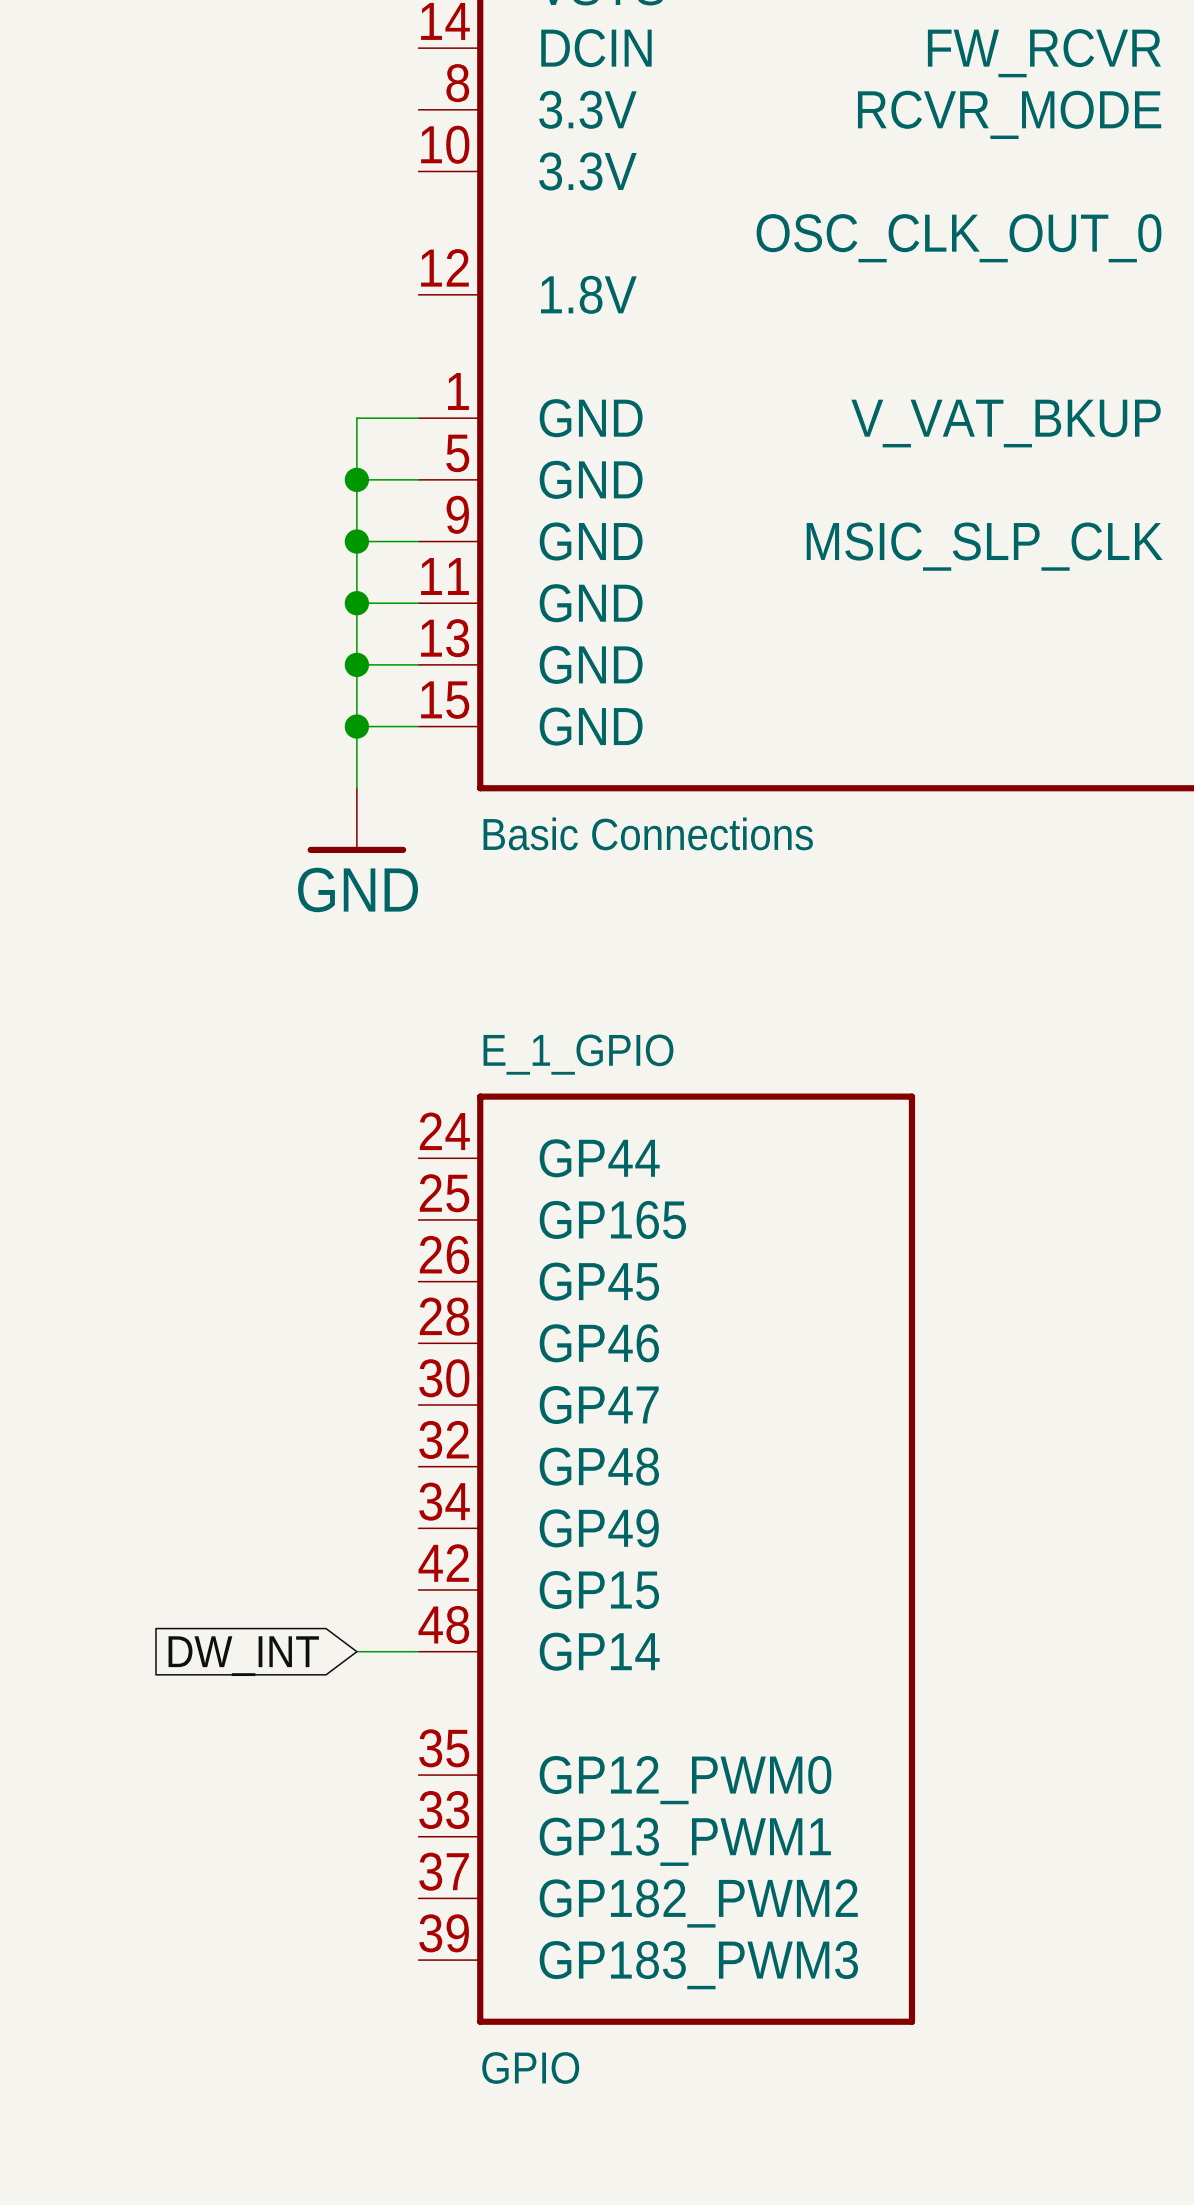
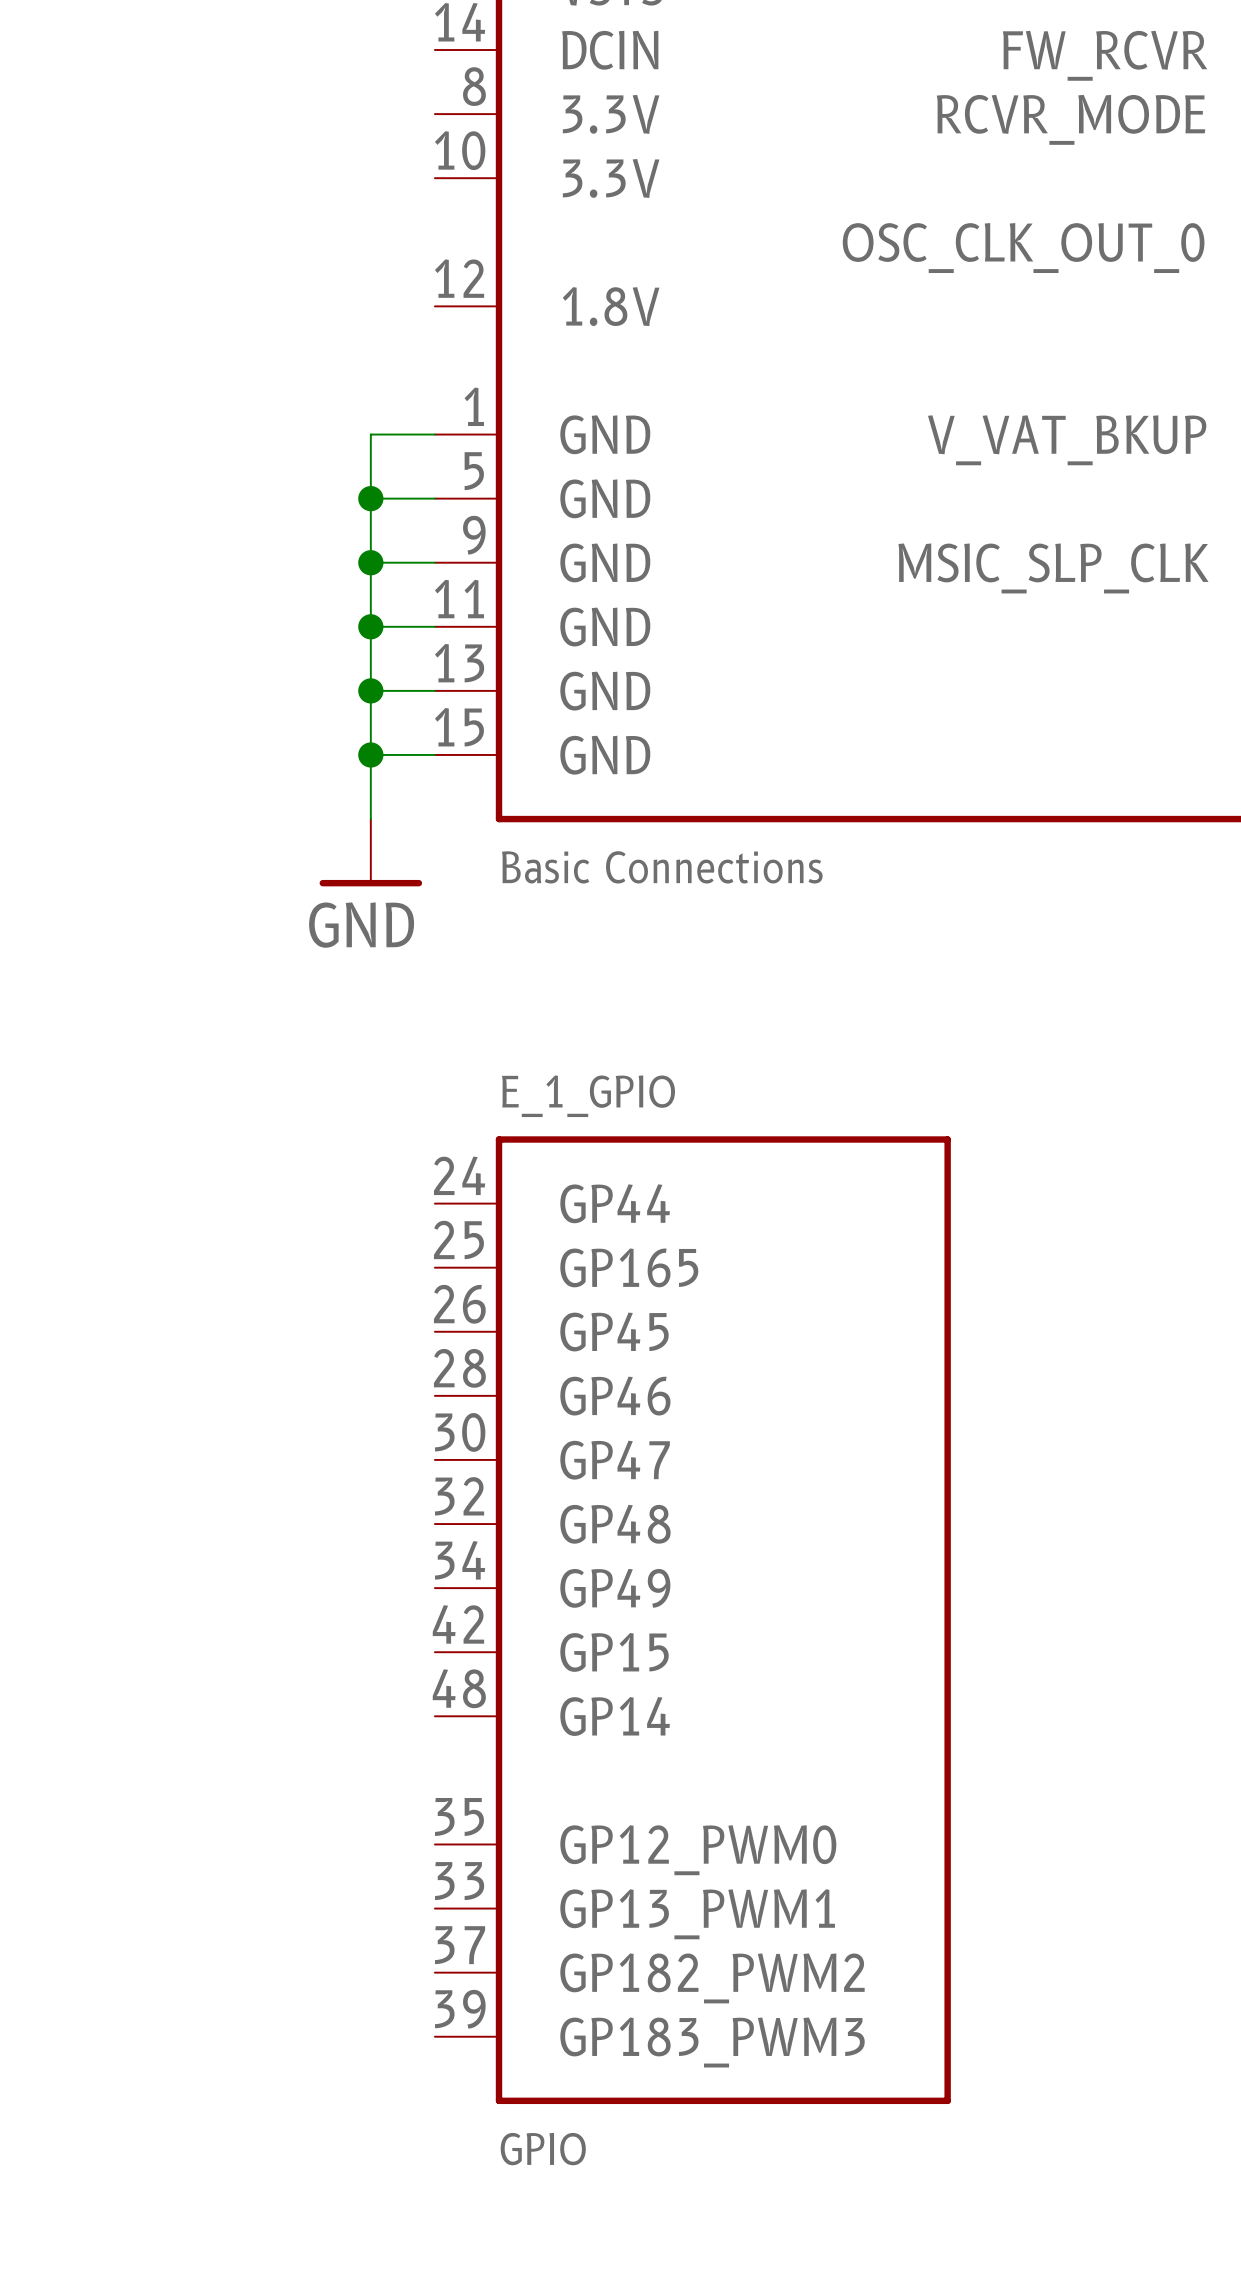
wire: (356, 1651) (418, 1651) -> none
global label: DW_INT (243, 1656) -> none

